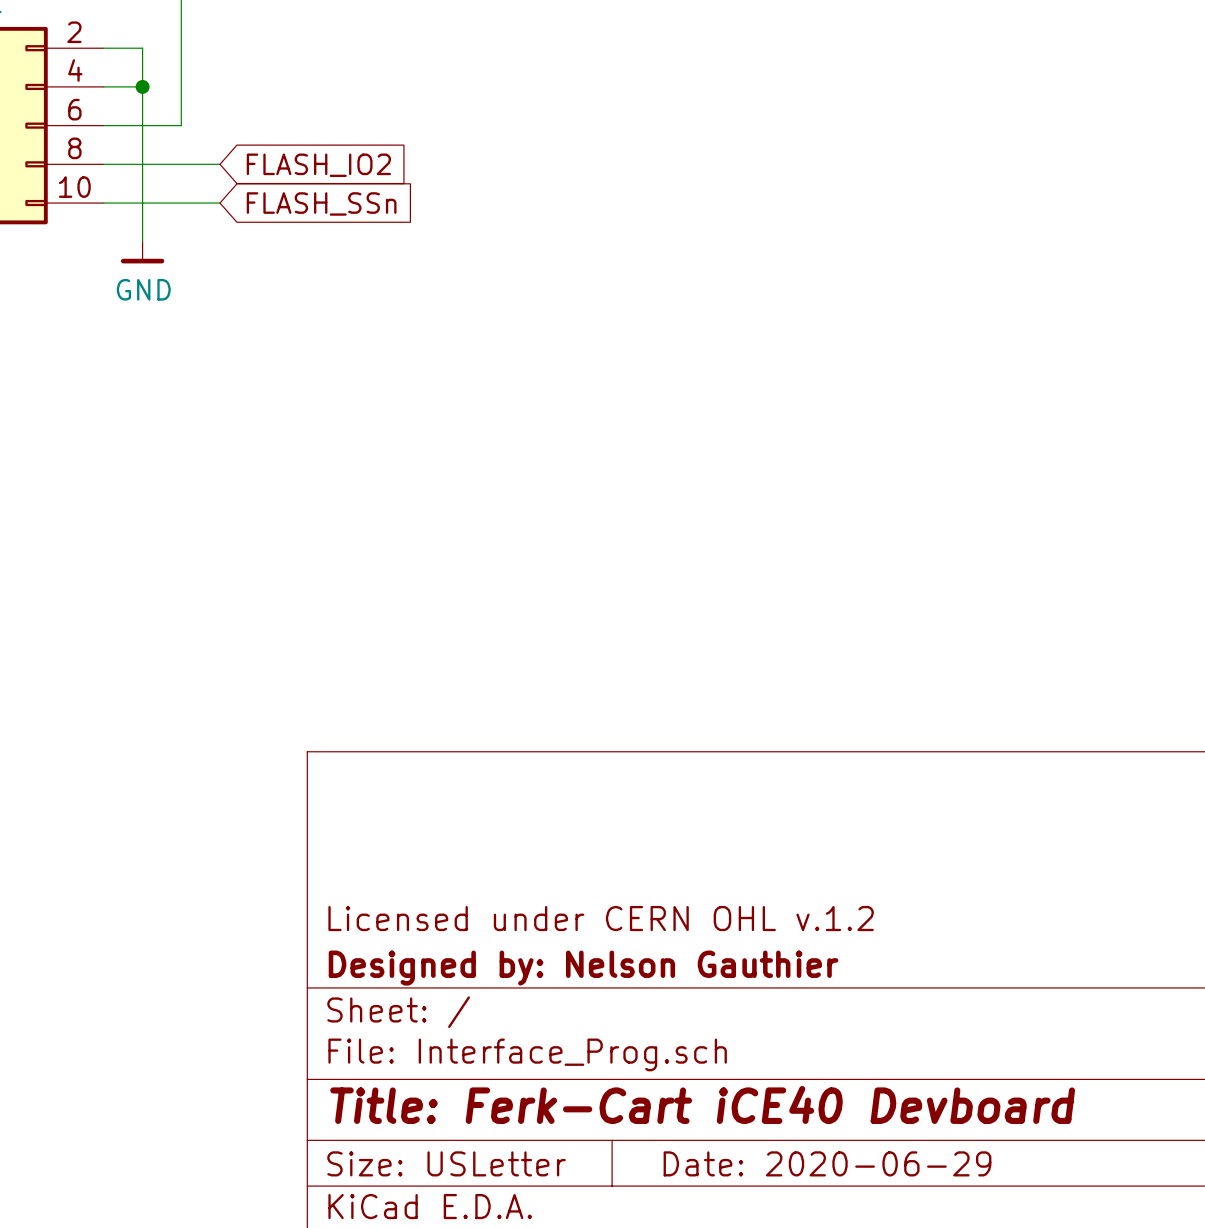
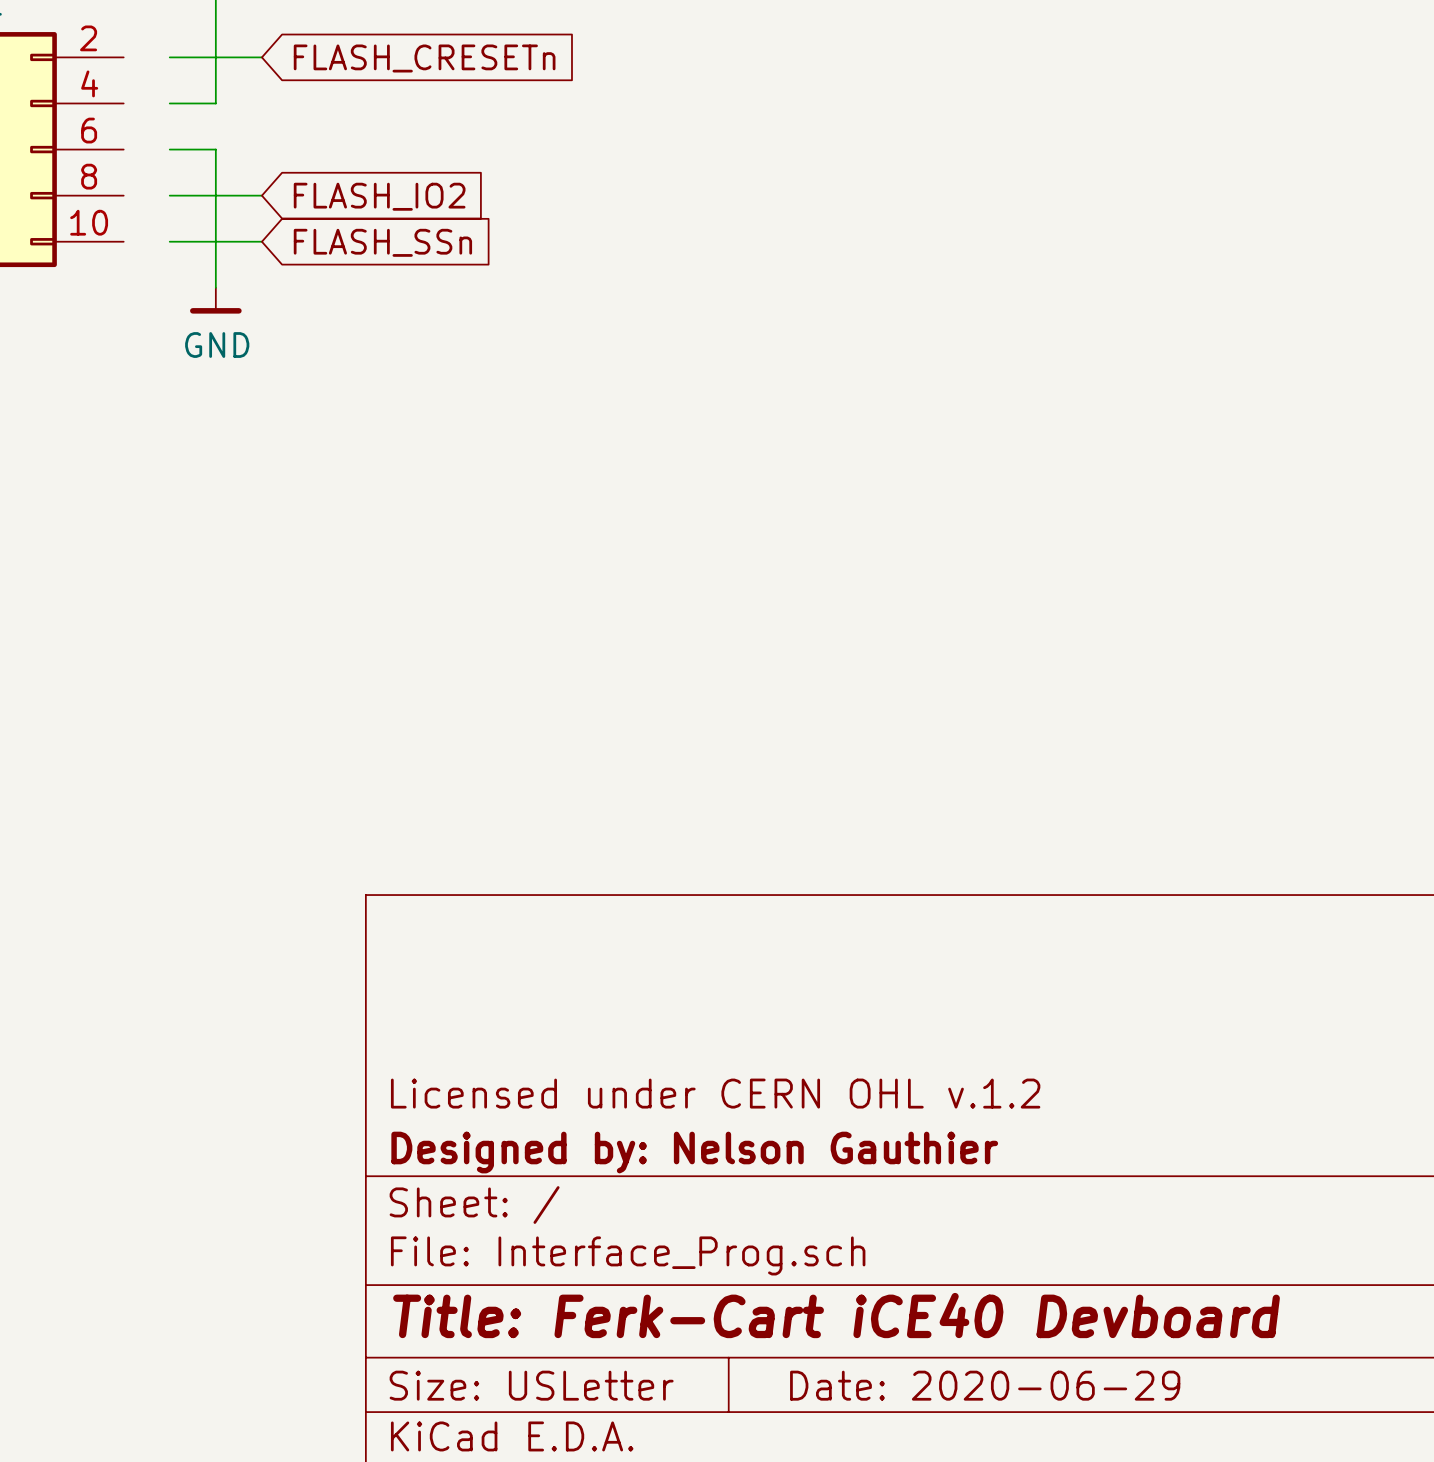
wire: (103, 48) (142, 48) (142, 241) -> none
wire: none -> (169, 57) (261, 57)
global label: none -> FLASH_CRESETn (424, 58)
wire: (103, 86) (142, 86) -> none
junction: (142, 86) -> none
wire: (181, 86) (181, 125) -> (215, 103) (169, 103)
wire: (103, 125) (142, 125) -> none
wire: none -> (215, 149) (215, 287)
wire: (103, 164) (142, 164) -> none
wire: (103, 203) (142, 203) -> none
power symbol position: GND (142, 252) -> GND (215, 300)

